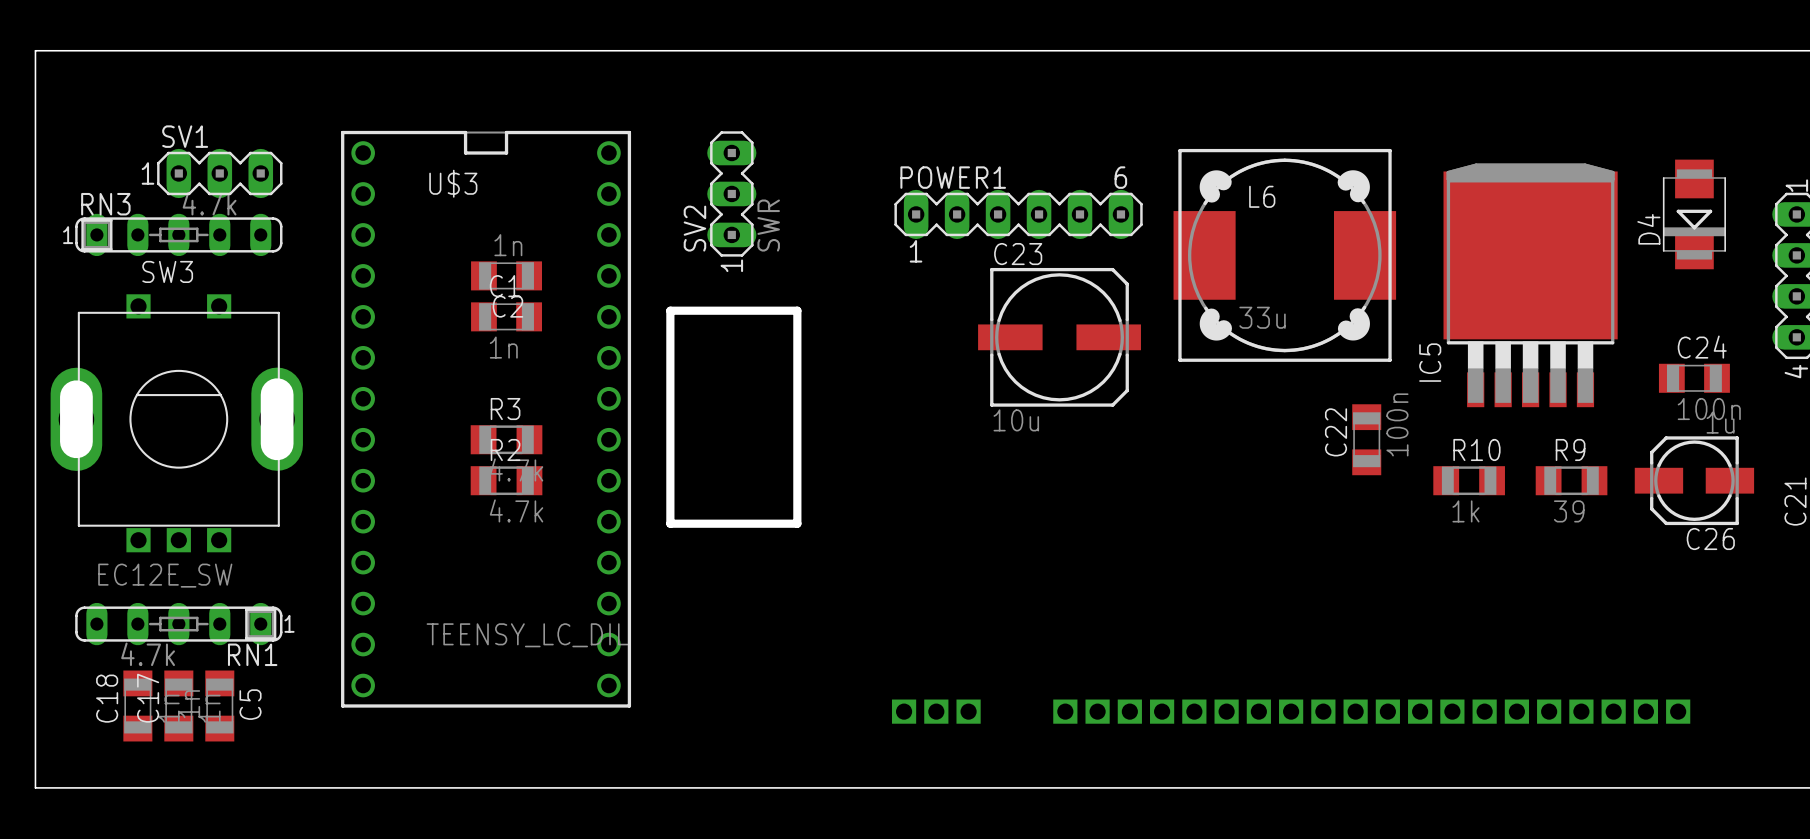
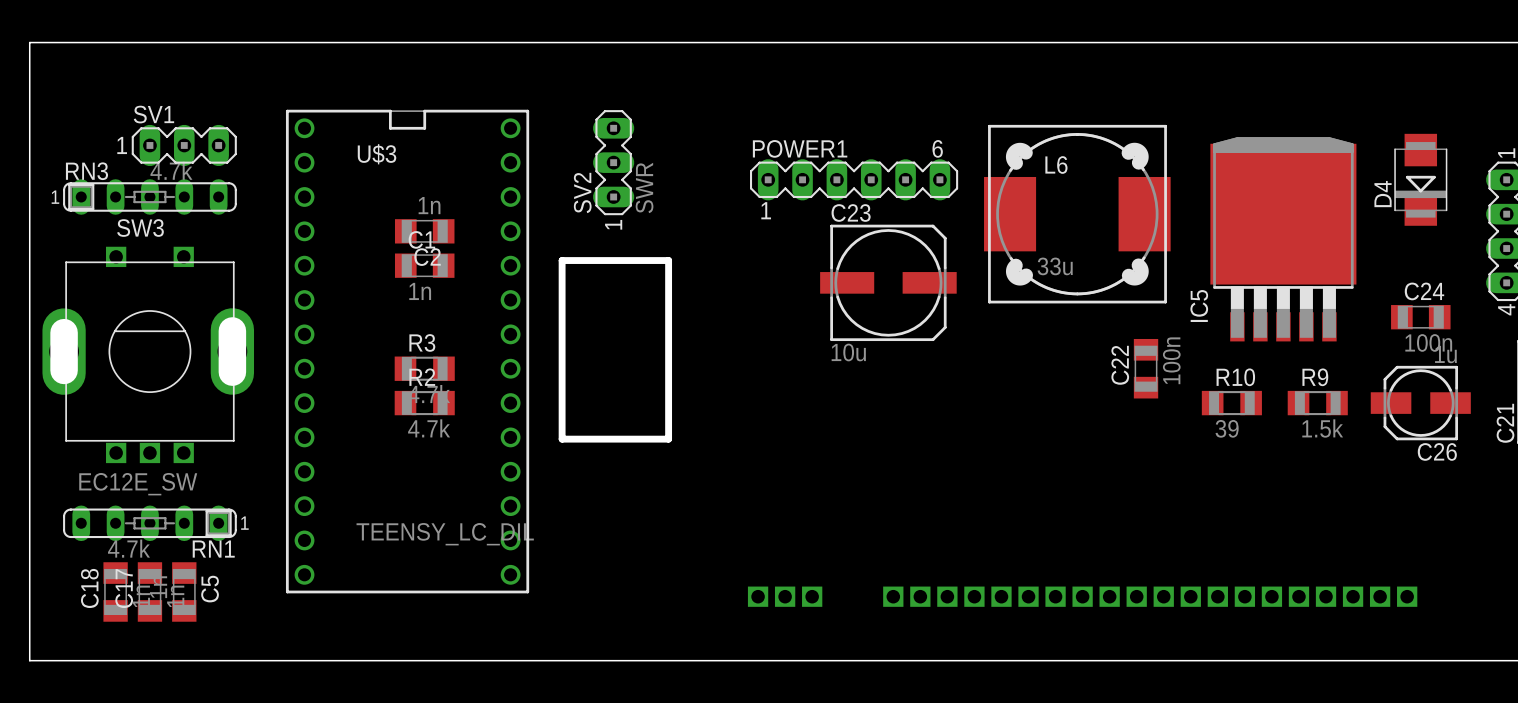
R10 value: 1k (1465, 511) -> 39 (1227, 428)
R9 value: 39 (1569, 511) -> 1.5k (1322, 428)

